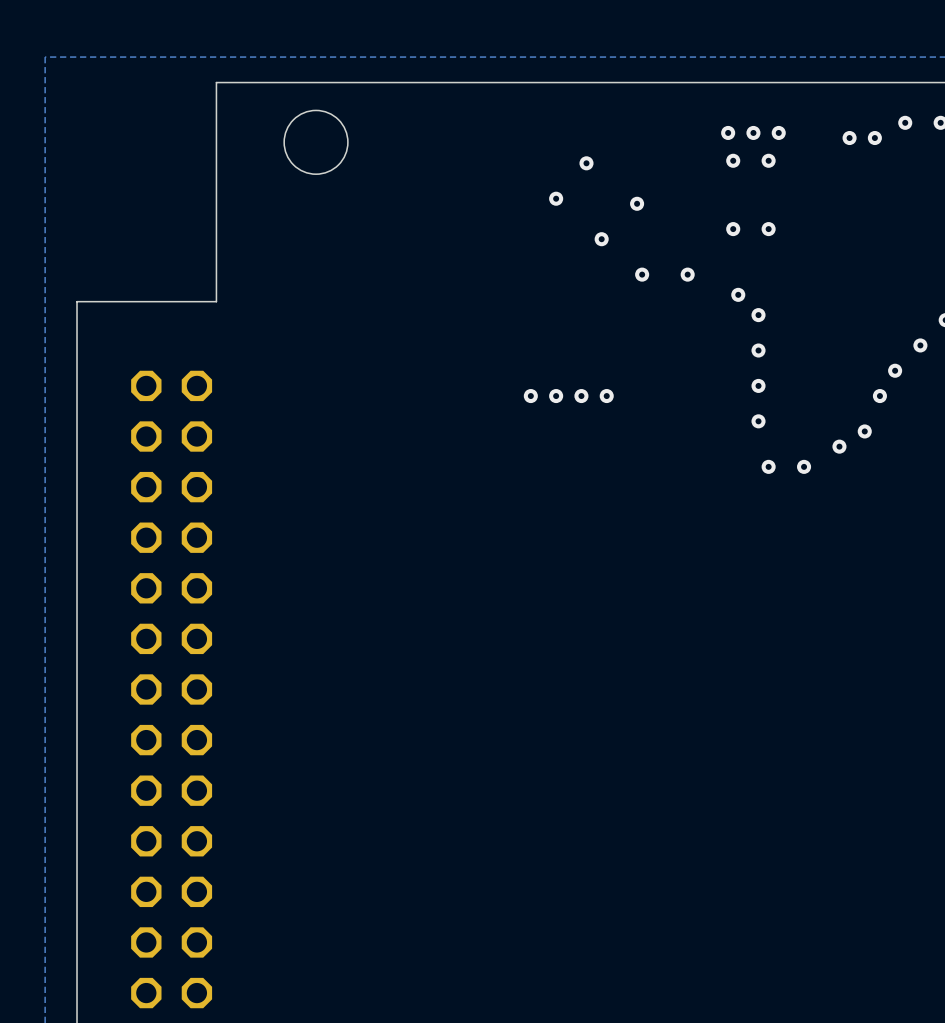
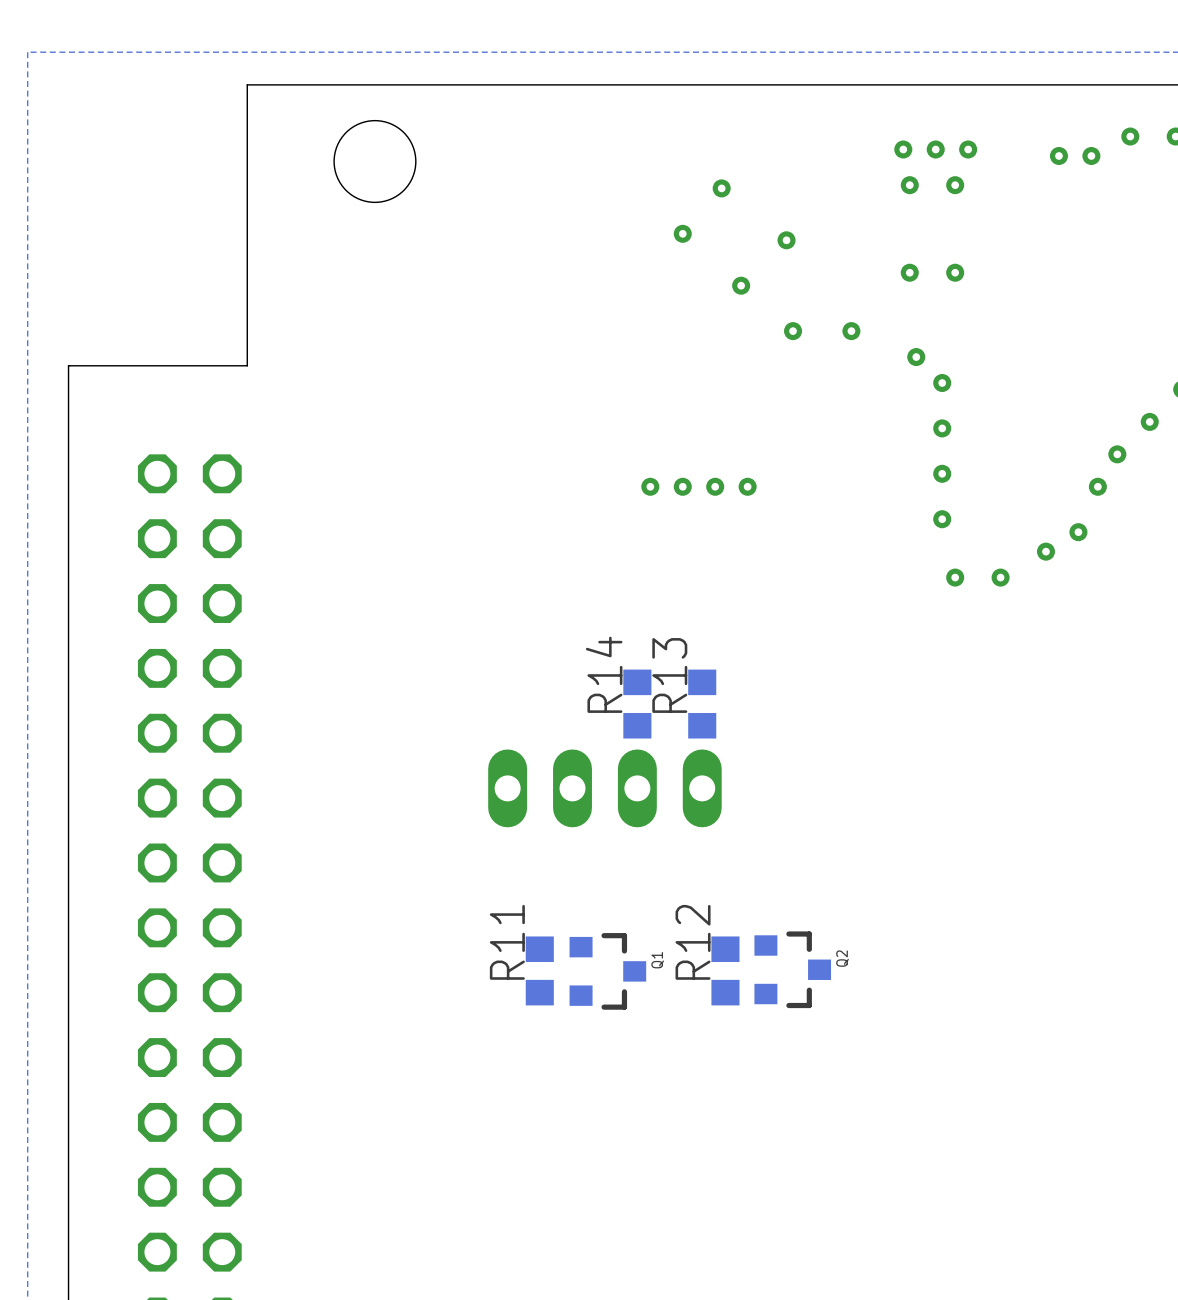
R14: none -> (637, 704)
R13: none -> (702, 704)
part: none -> (604, 788)
Q2: none -> (792, 969)
R11: none -> (539, 970)
R12: none -> (725, 970)
Q1: none -> (607, 971)

